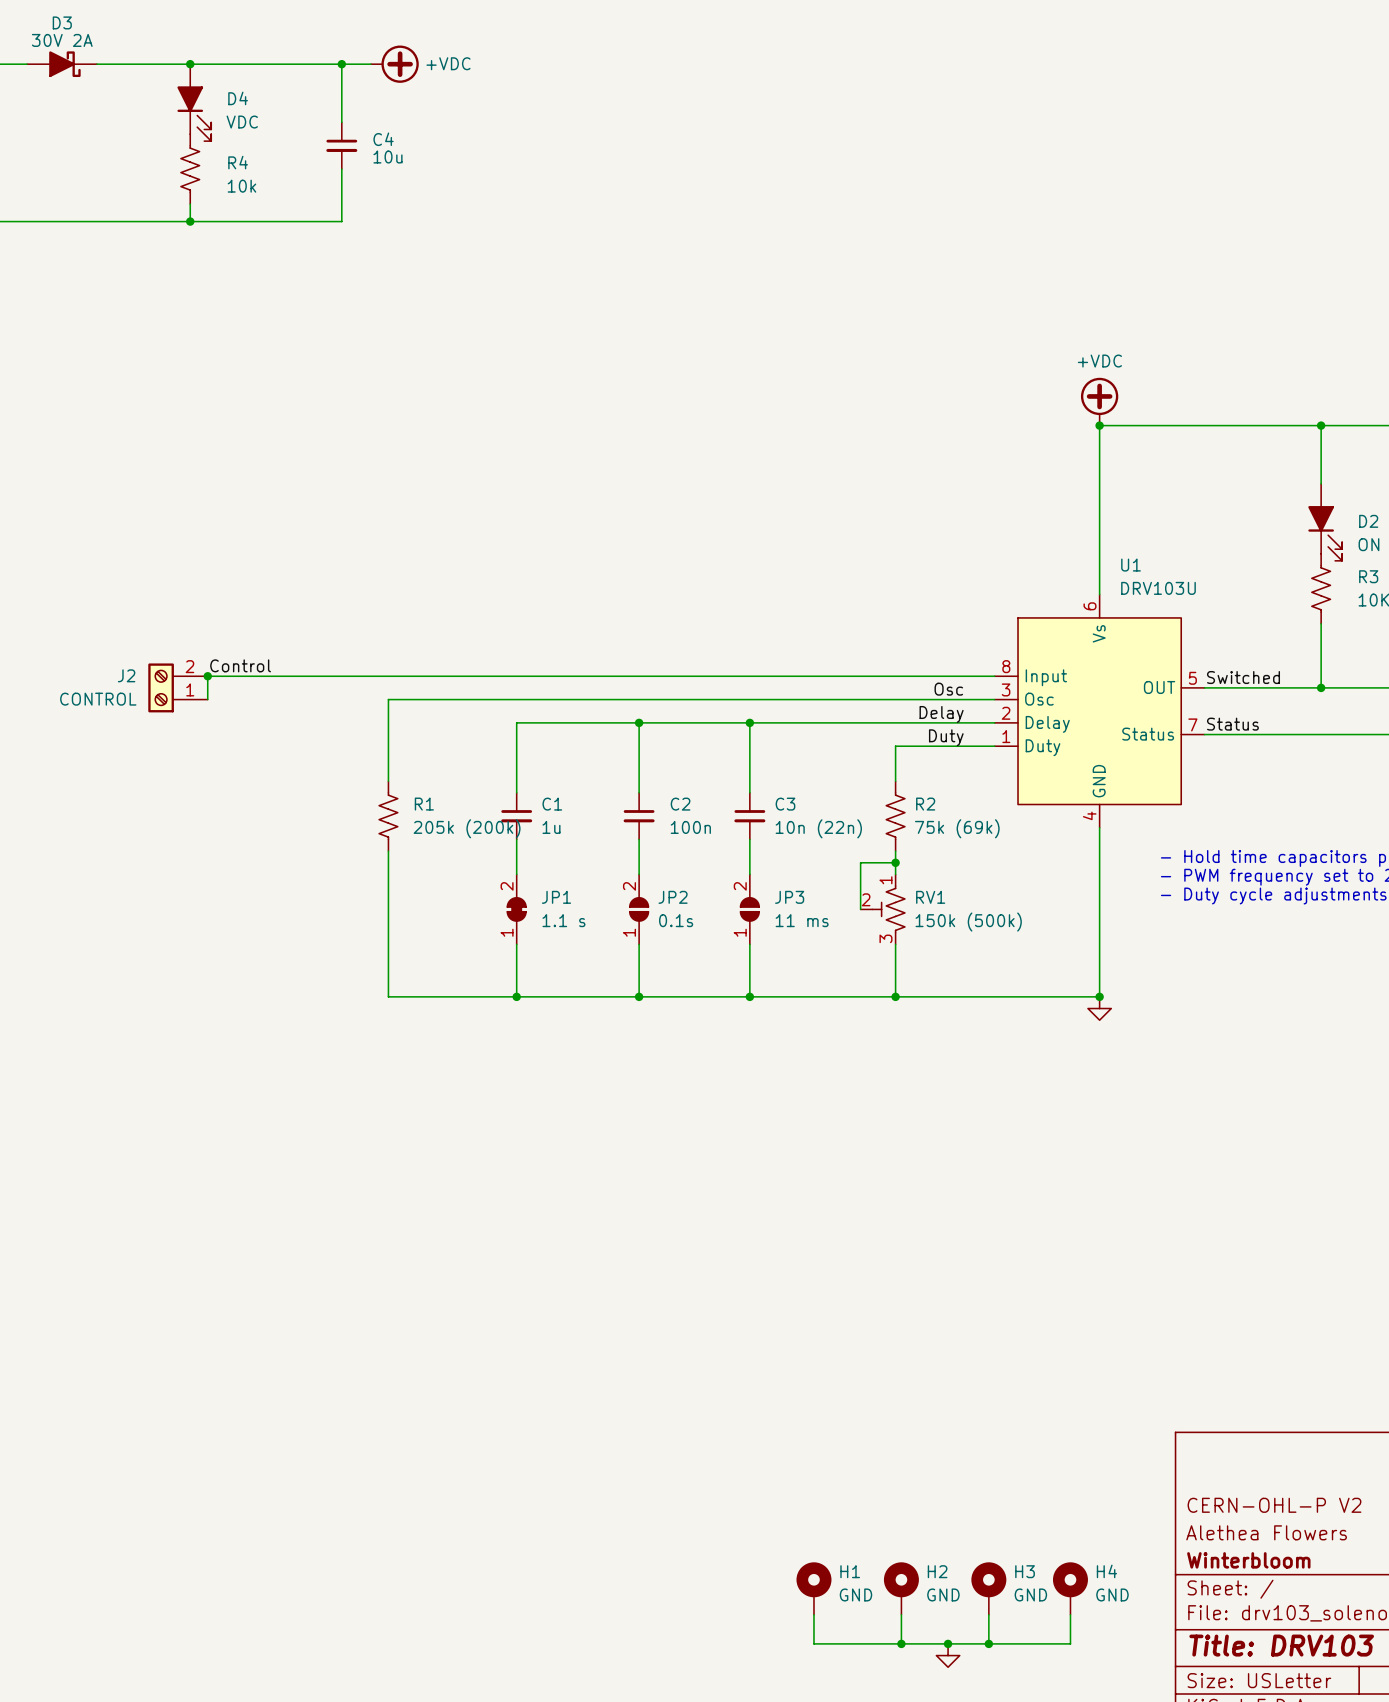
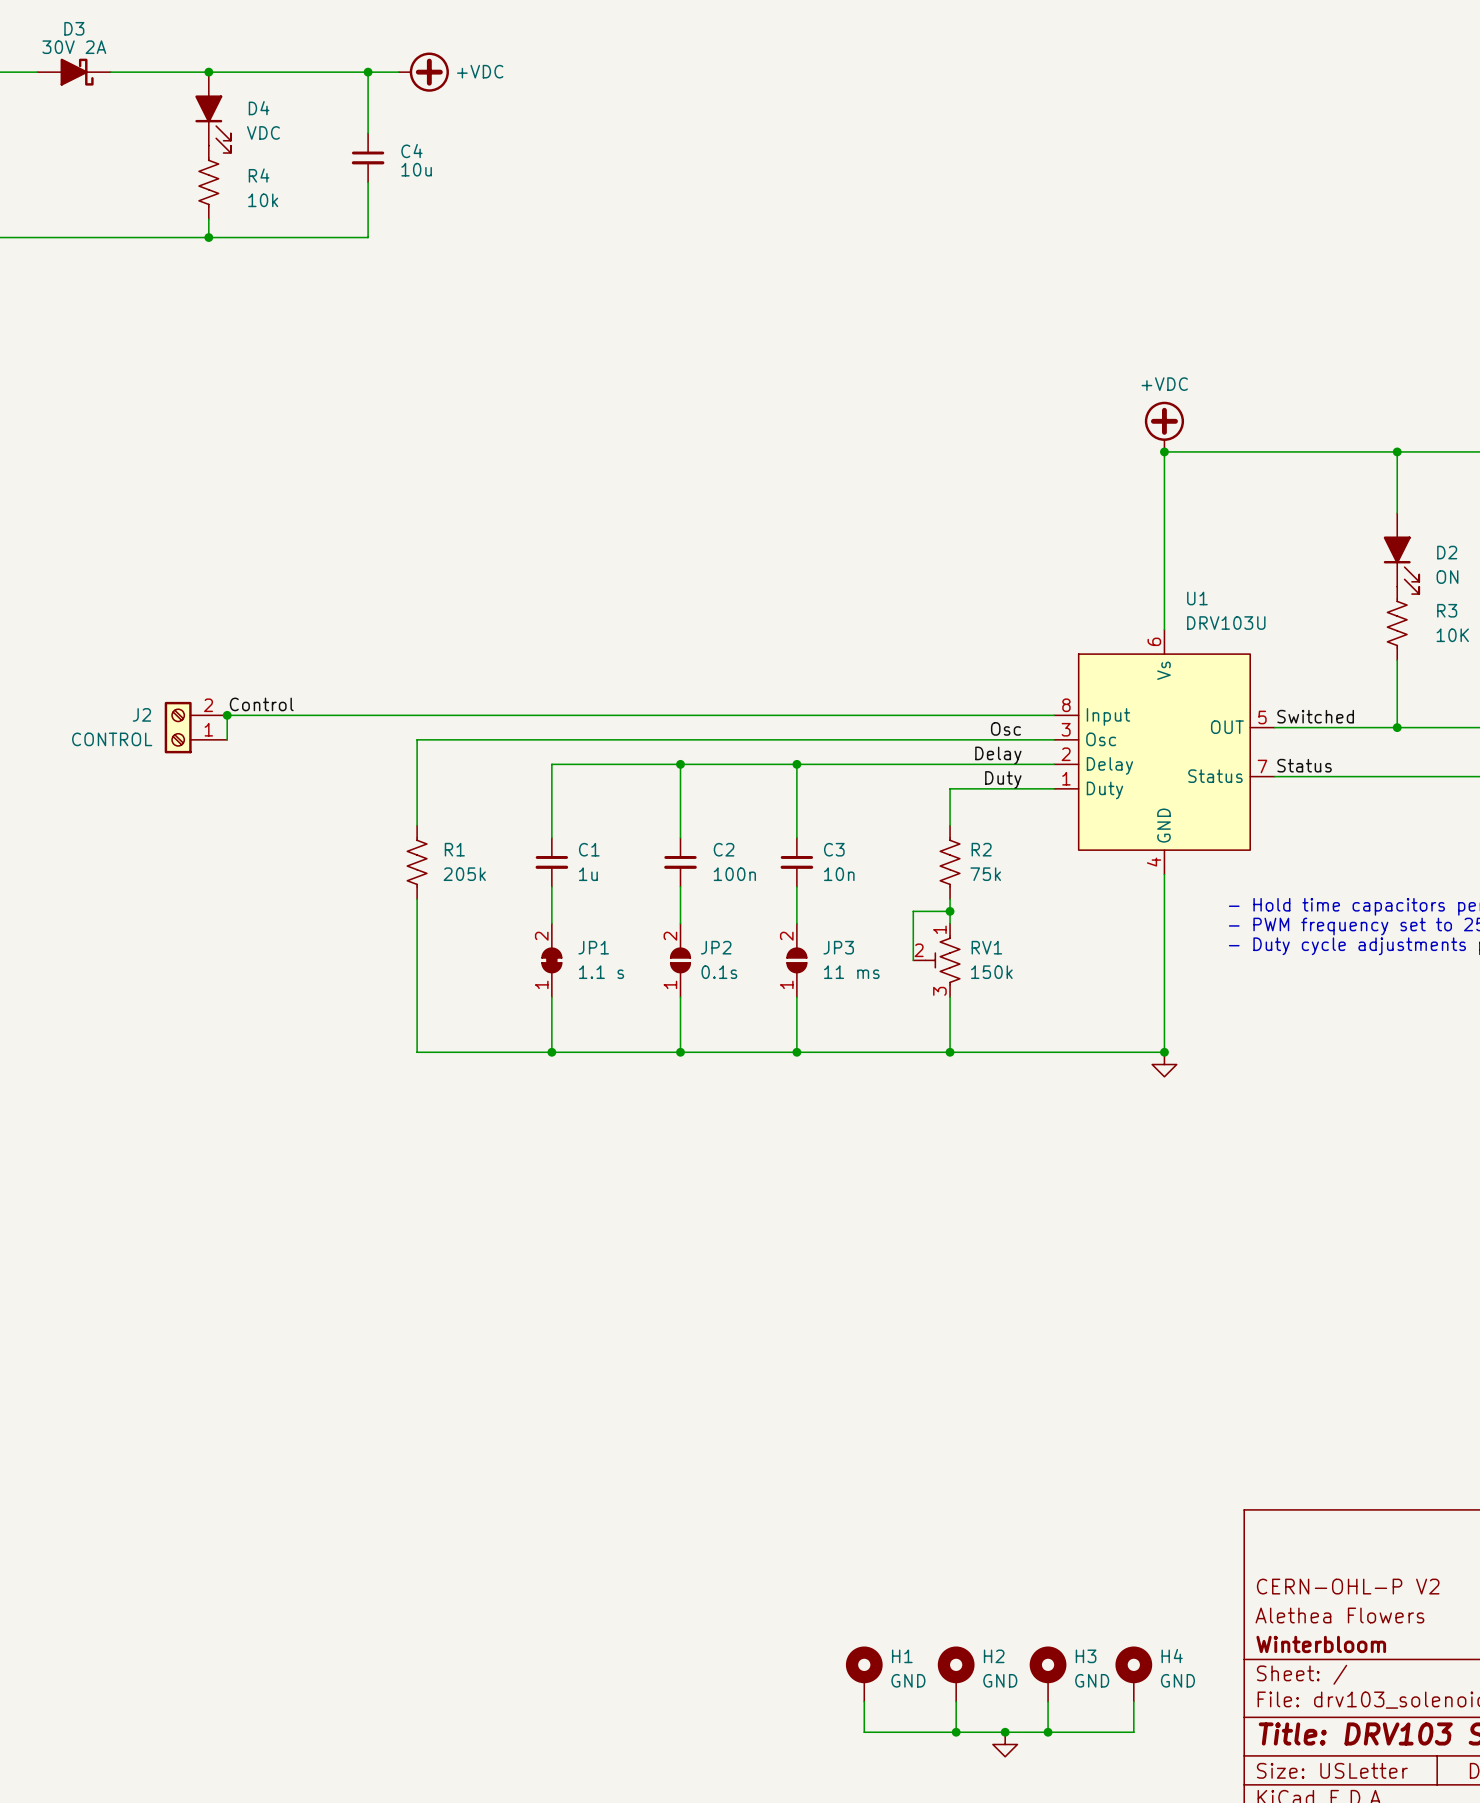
R1 value: 205k (200k) (467, 828) -> 205k (464, 874)
C3 value: 10n (22n) (818, 828) -> 10n (839, 874)
R2 value: 75k (69k) (957, 828) -> 75k (985, 874)
RV1 value: 150k (500k) (968, 922) -> 150k (991, 972)

